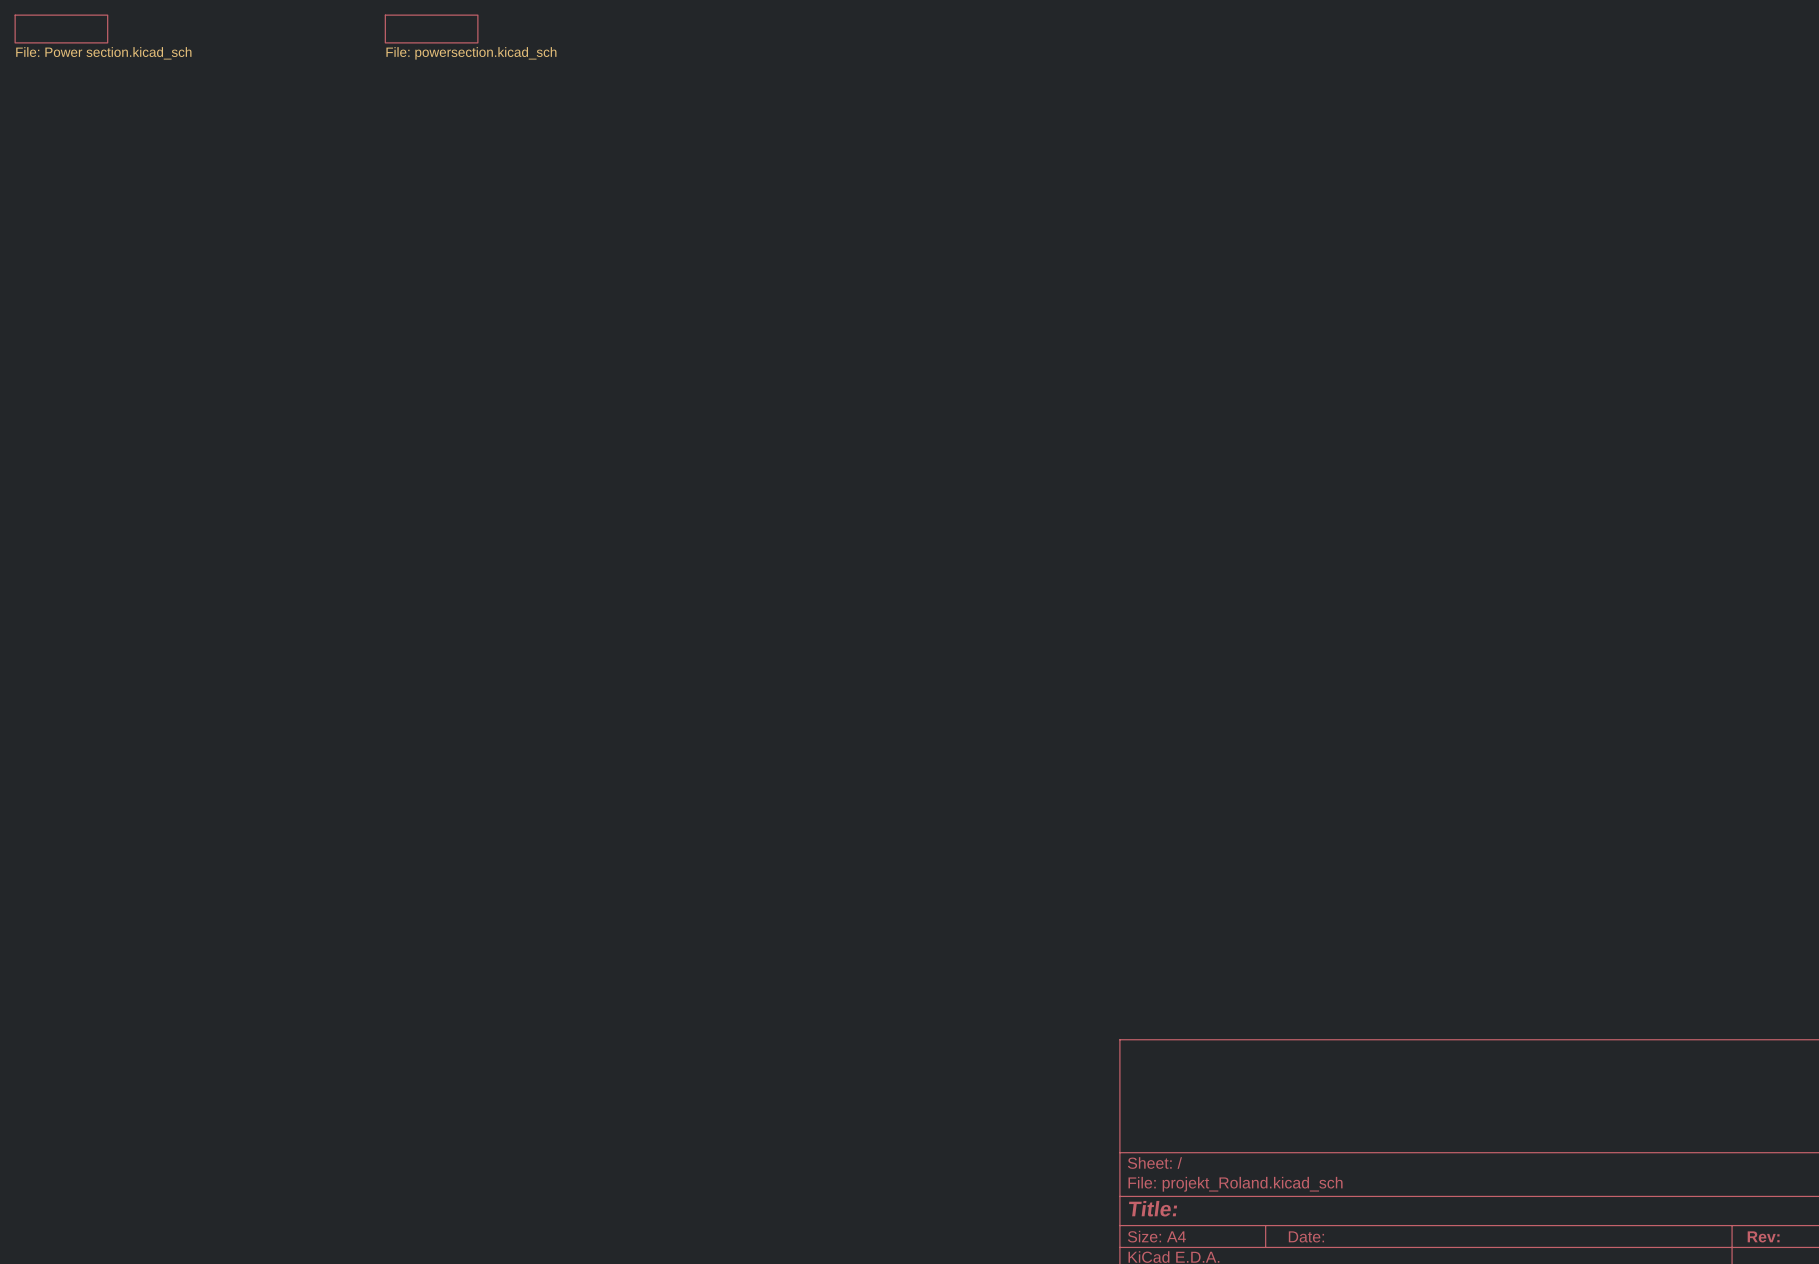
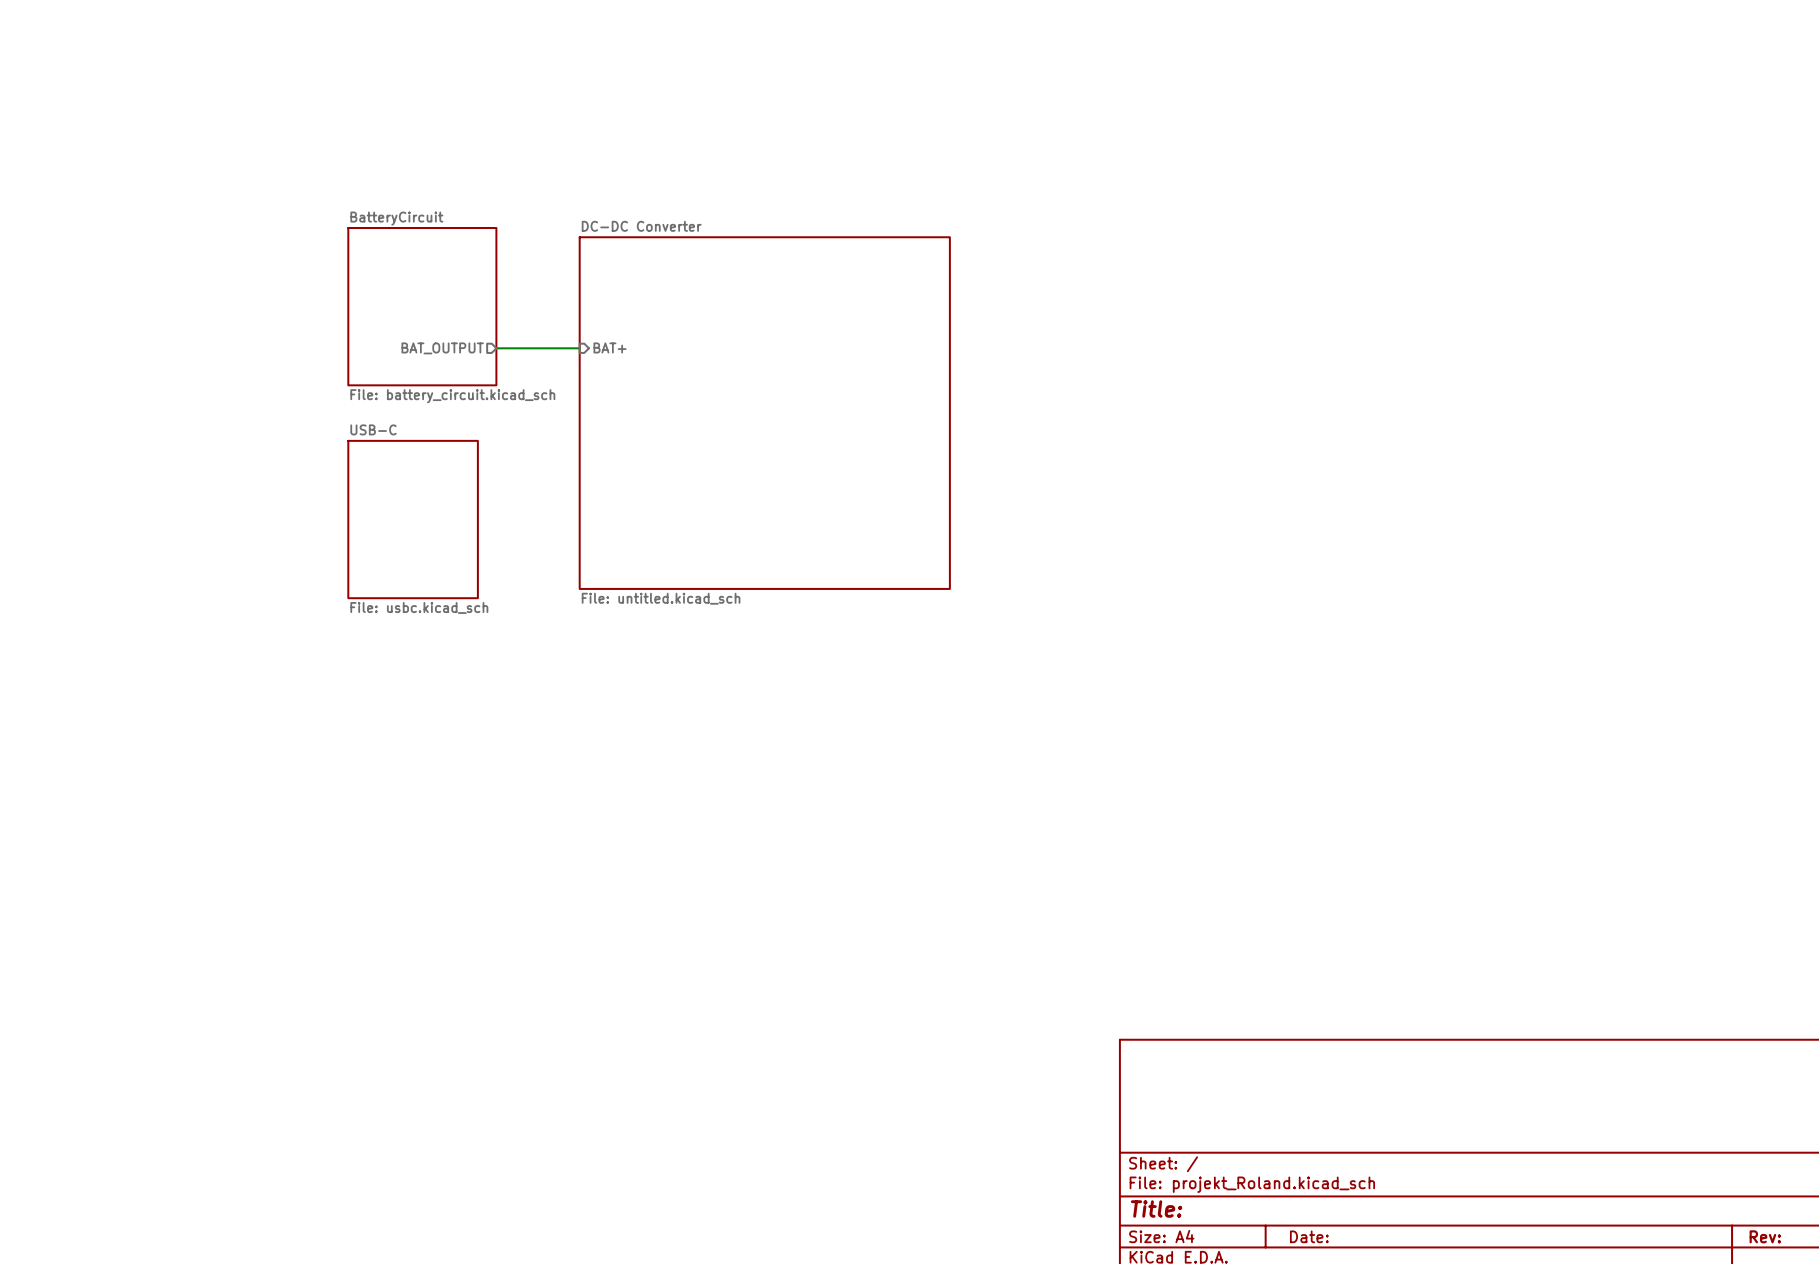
sheet: File: Power section.kicad_sch (61, 29) -> none
sheet: File: powersection.kicad_sch (431, 29) -> none
sheet BatteryCircuit: none -> File: battery_circuit.kicad_sch (422, 306)
sheet pin: none -> BAT+ (610, 347)
wire: none -> (496, 348) (579, 348)
sheet pin: none -> BAT_OUTPUT (442, 348)
sheet DC-DC Converter: none -> File: untitled.kicad_sch (764, 413)
sheet USB-C: none -> File: usbc.kicad_sch (413, 519)

